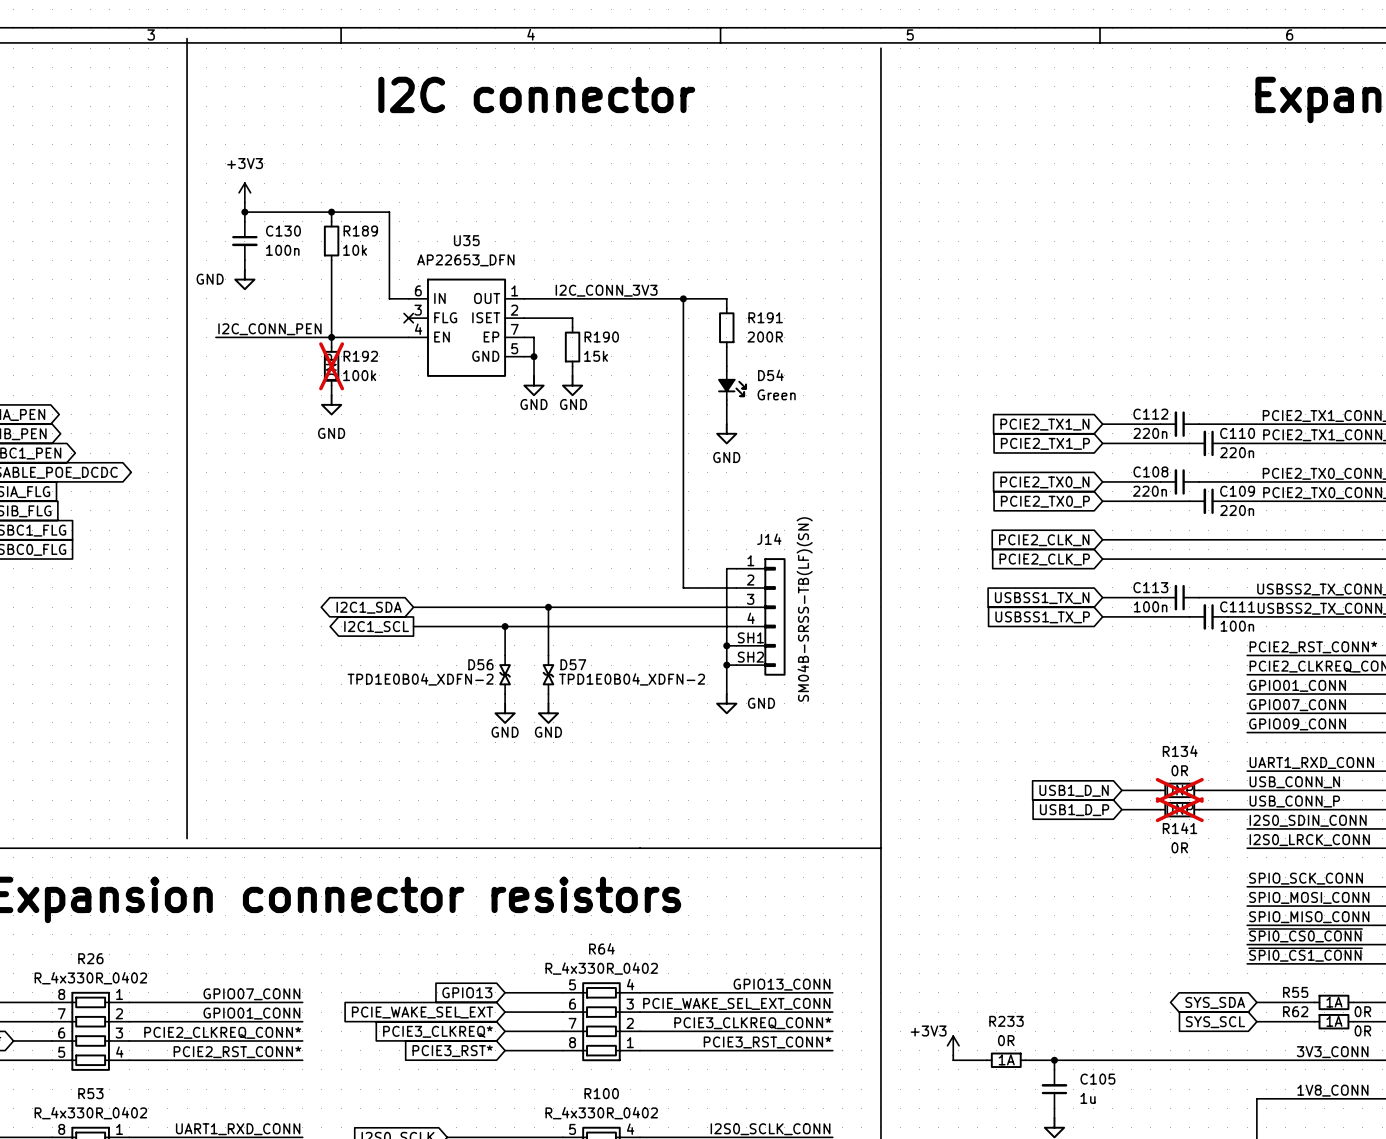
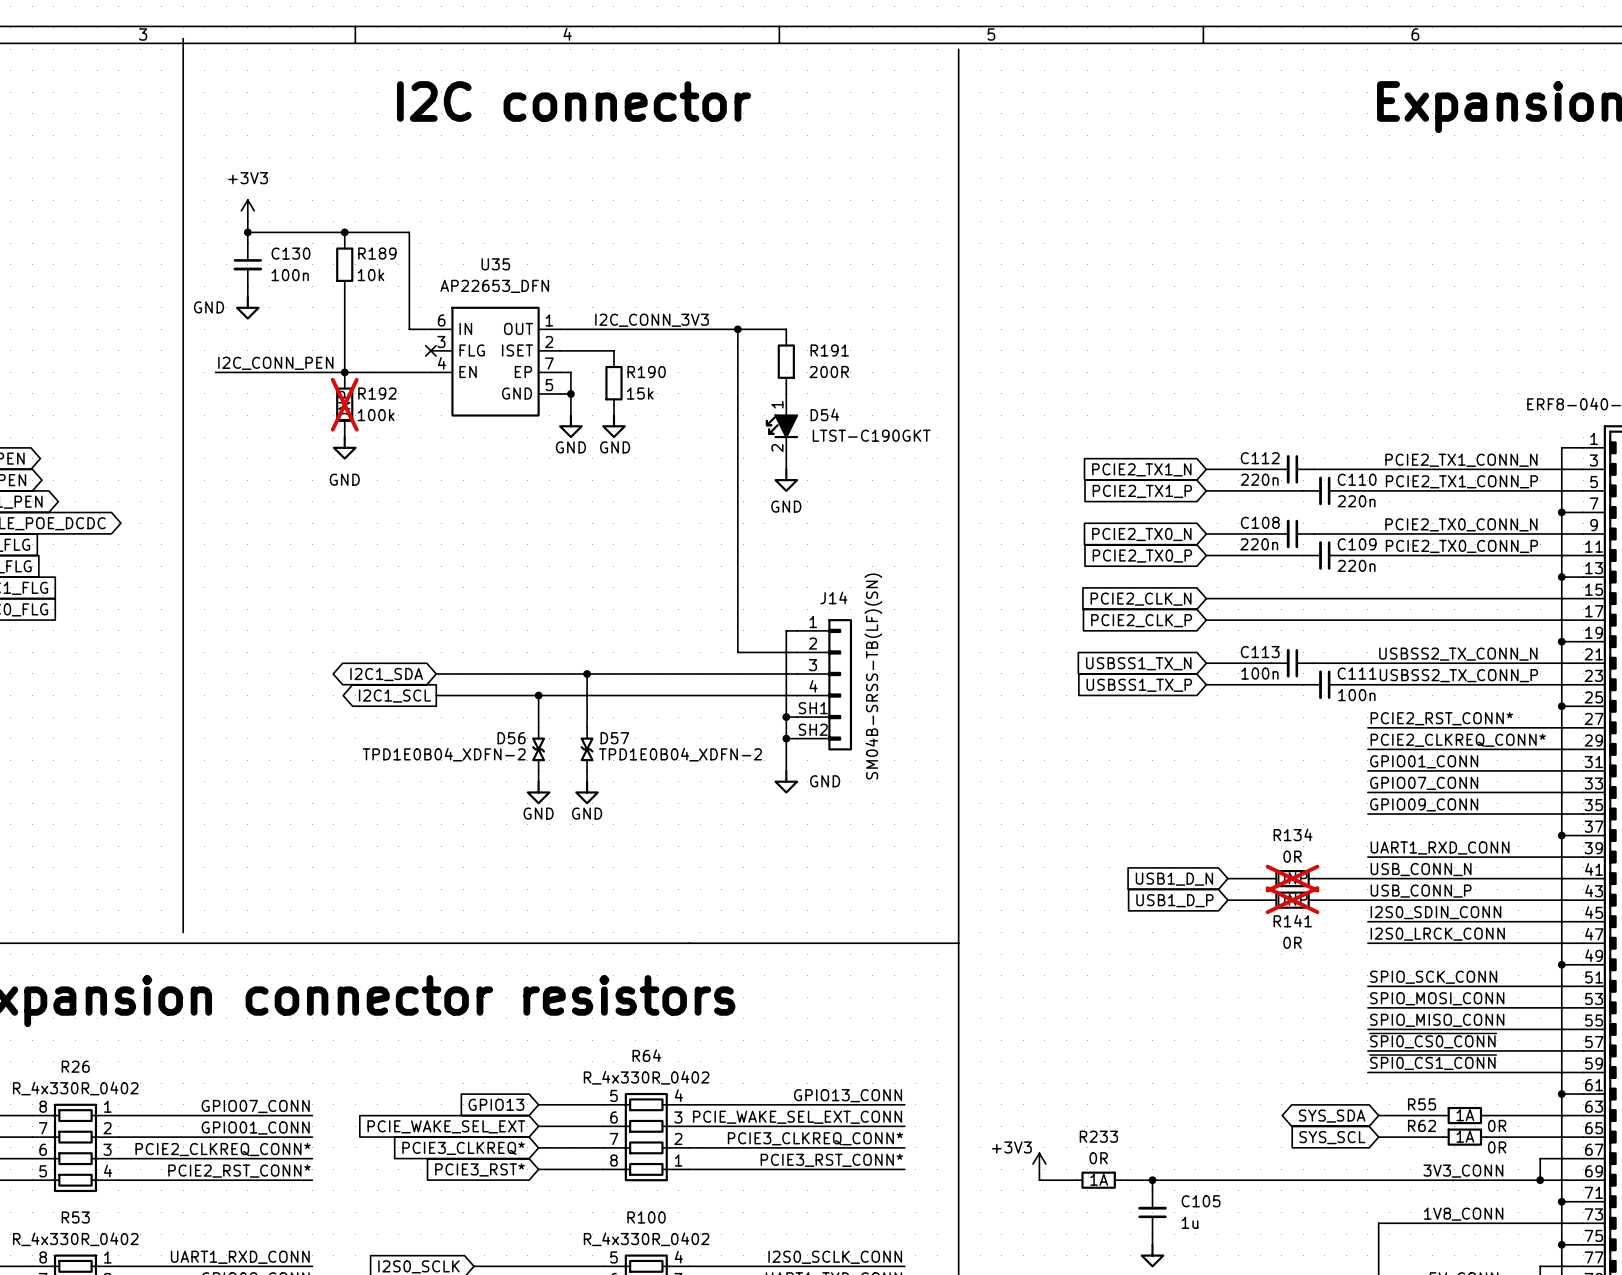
D54 symbol: [718, 366, 748, 405] -> [765, 393, 799, 459]
D54 text: Green (776, 394) -> none
D54 text: none -> LTST-C190GKT (871, 435)

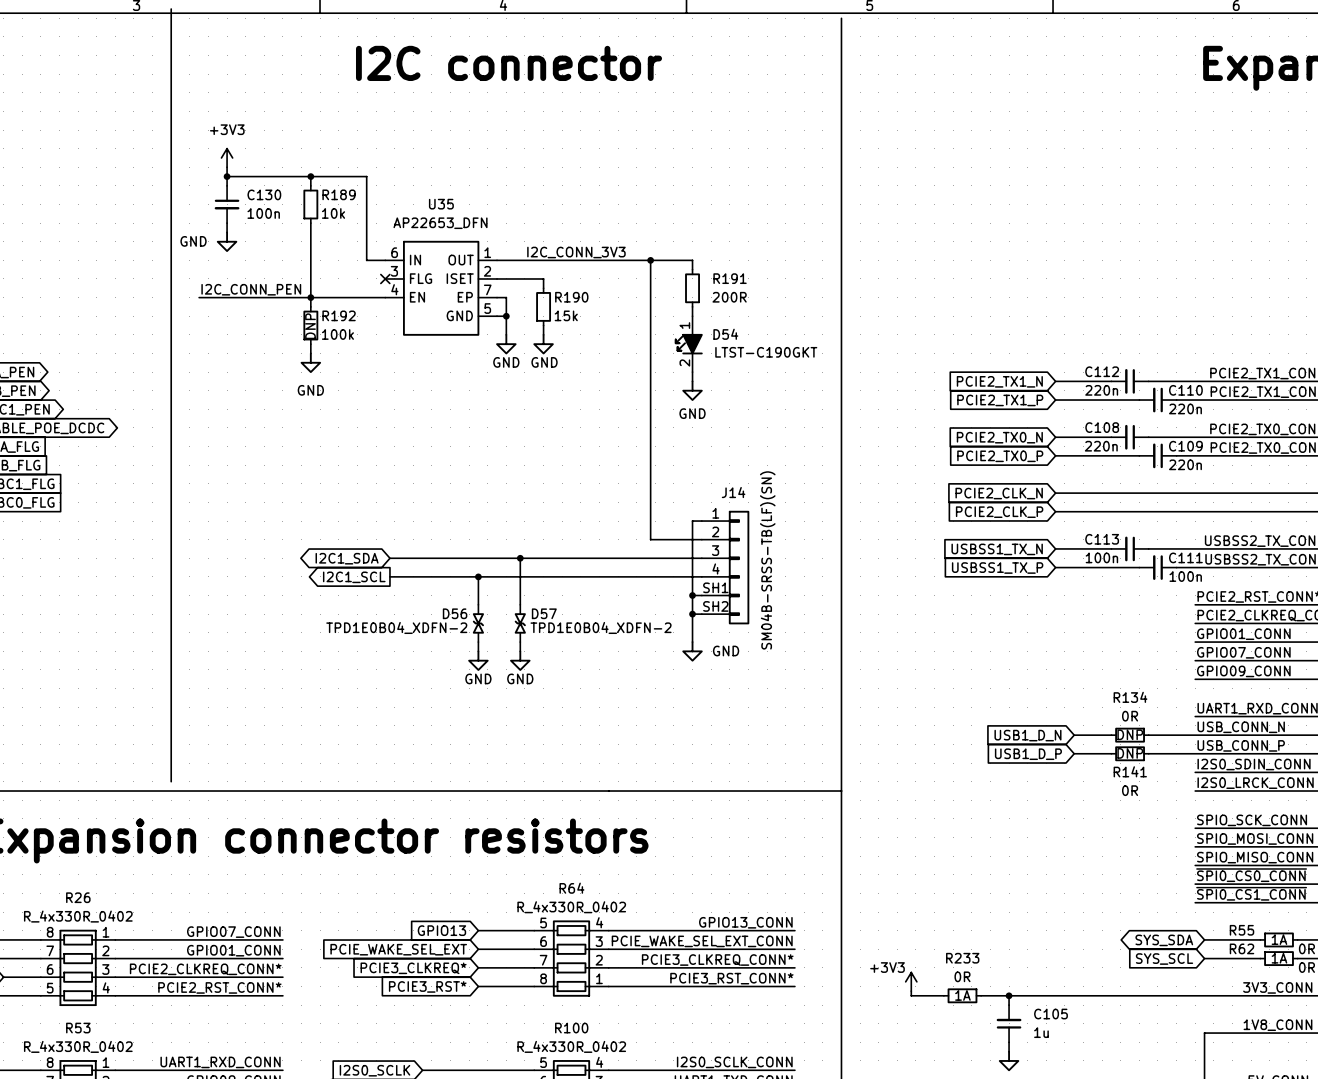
R192 do-not-place cross: (344, 404) -> none
R134 do-not-place cross: (1292, 878) -> none
R141 do-not-place cross: (1292, 900) -> none

